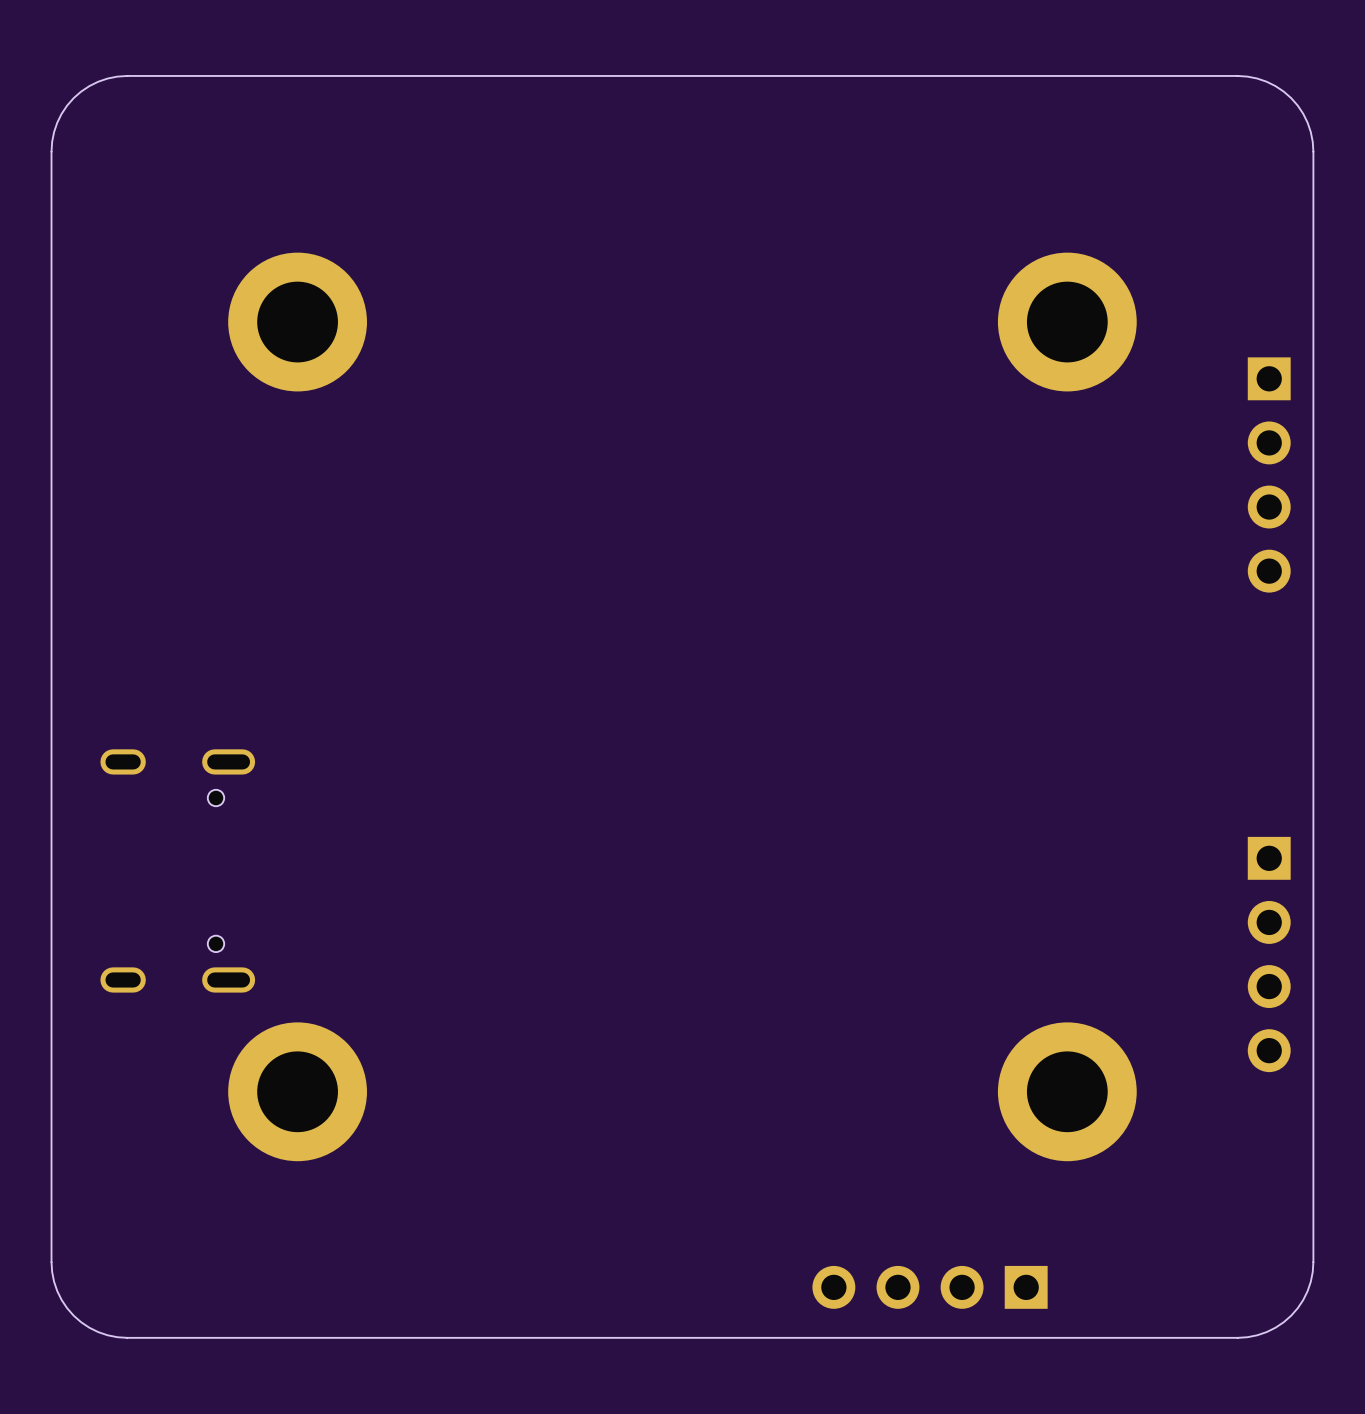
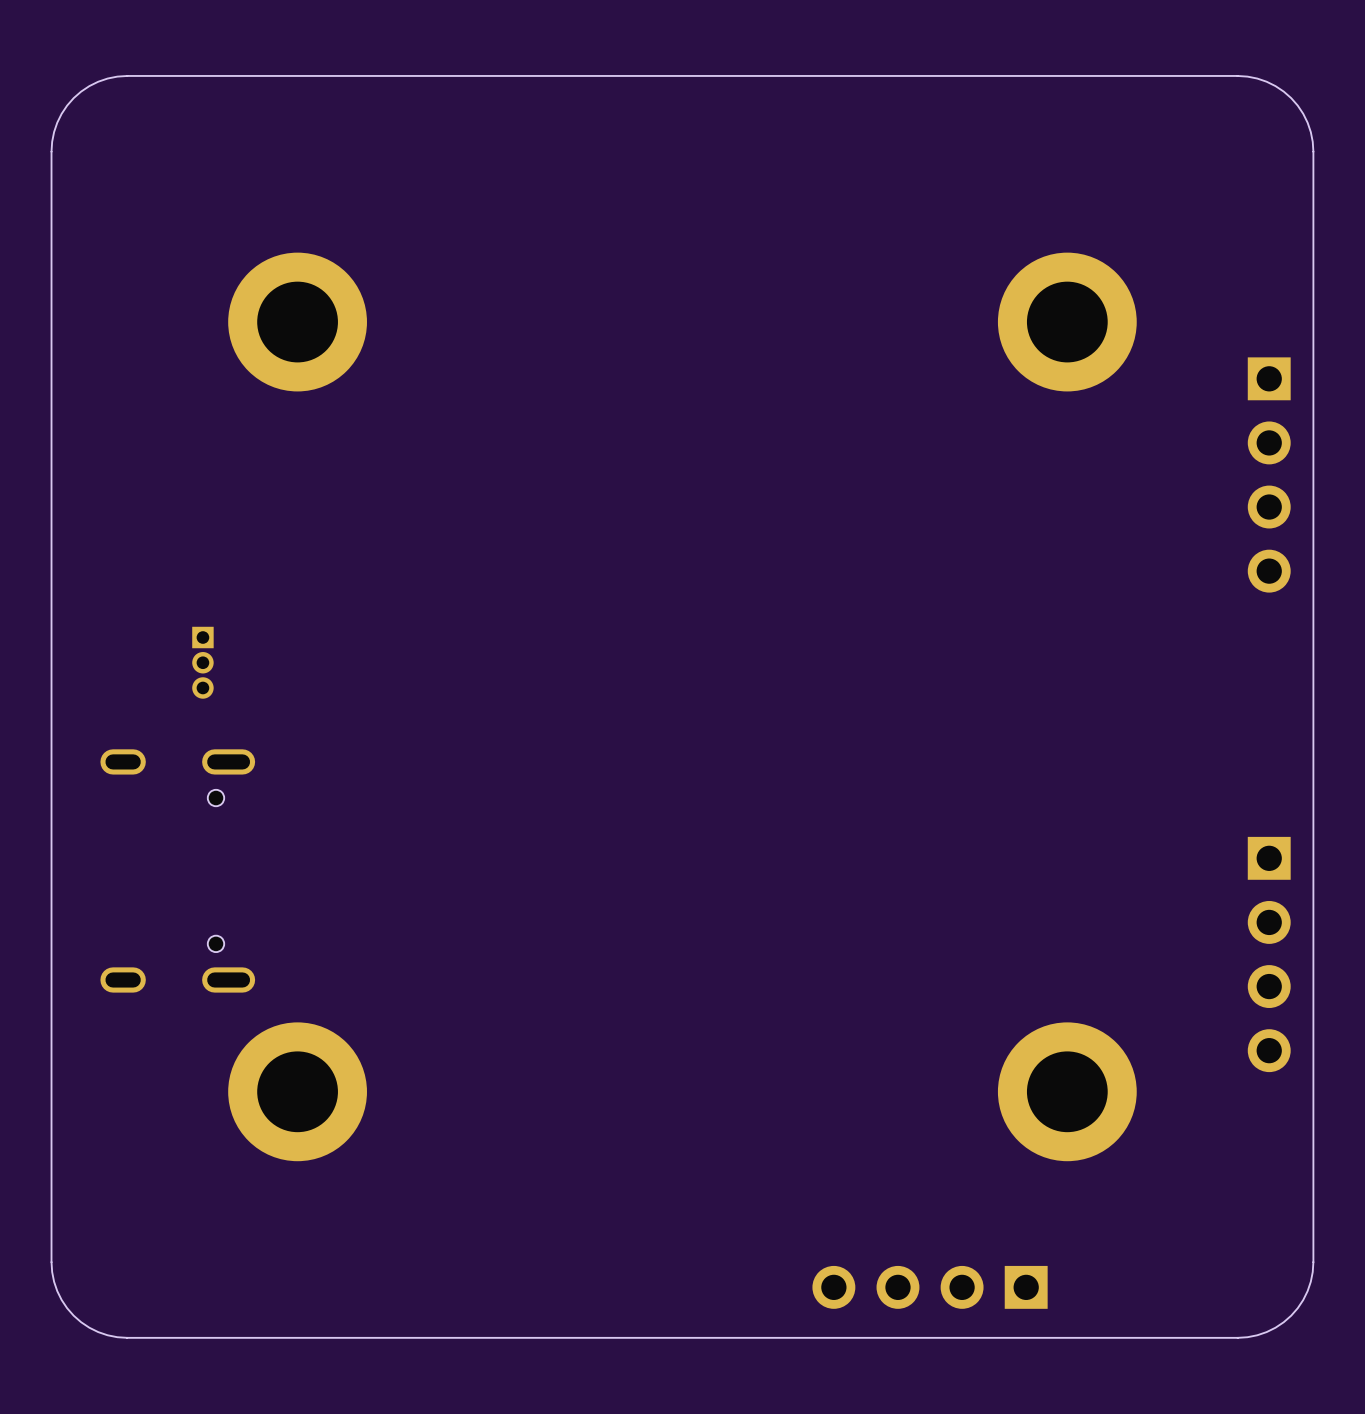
part: none -> (202, 662)

